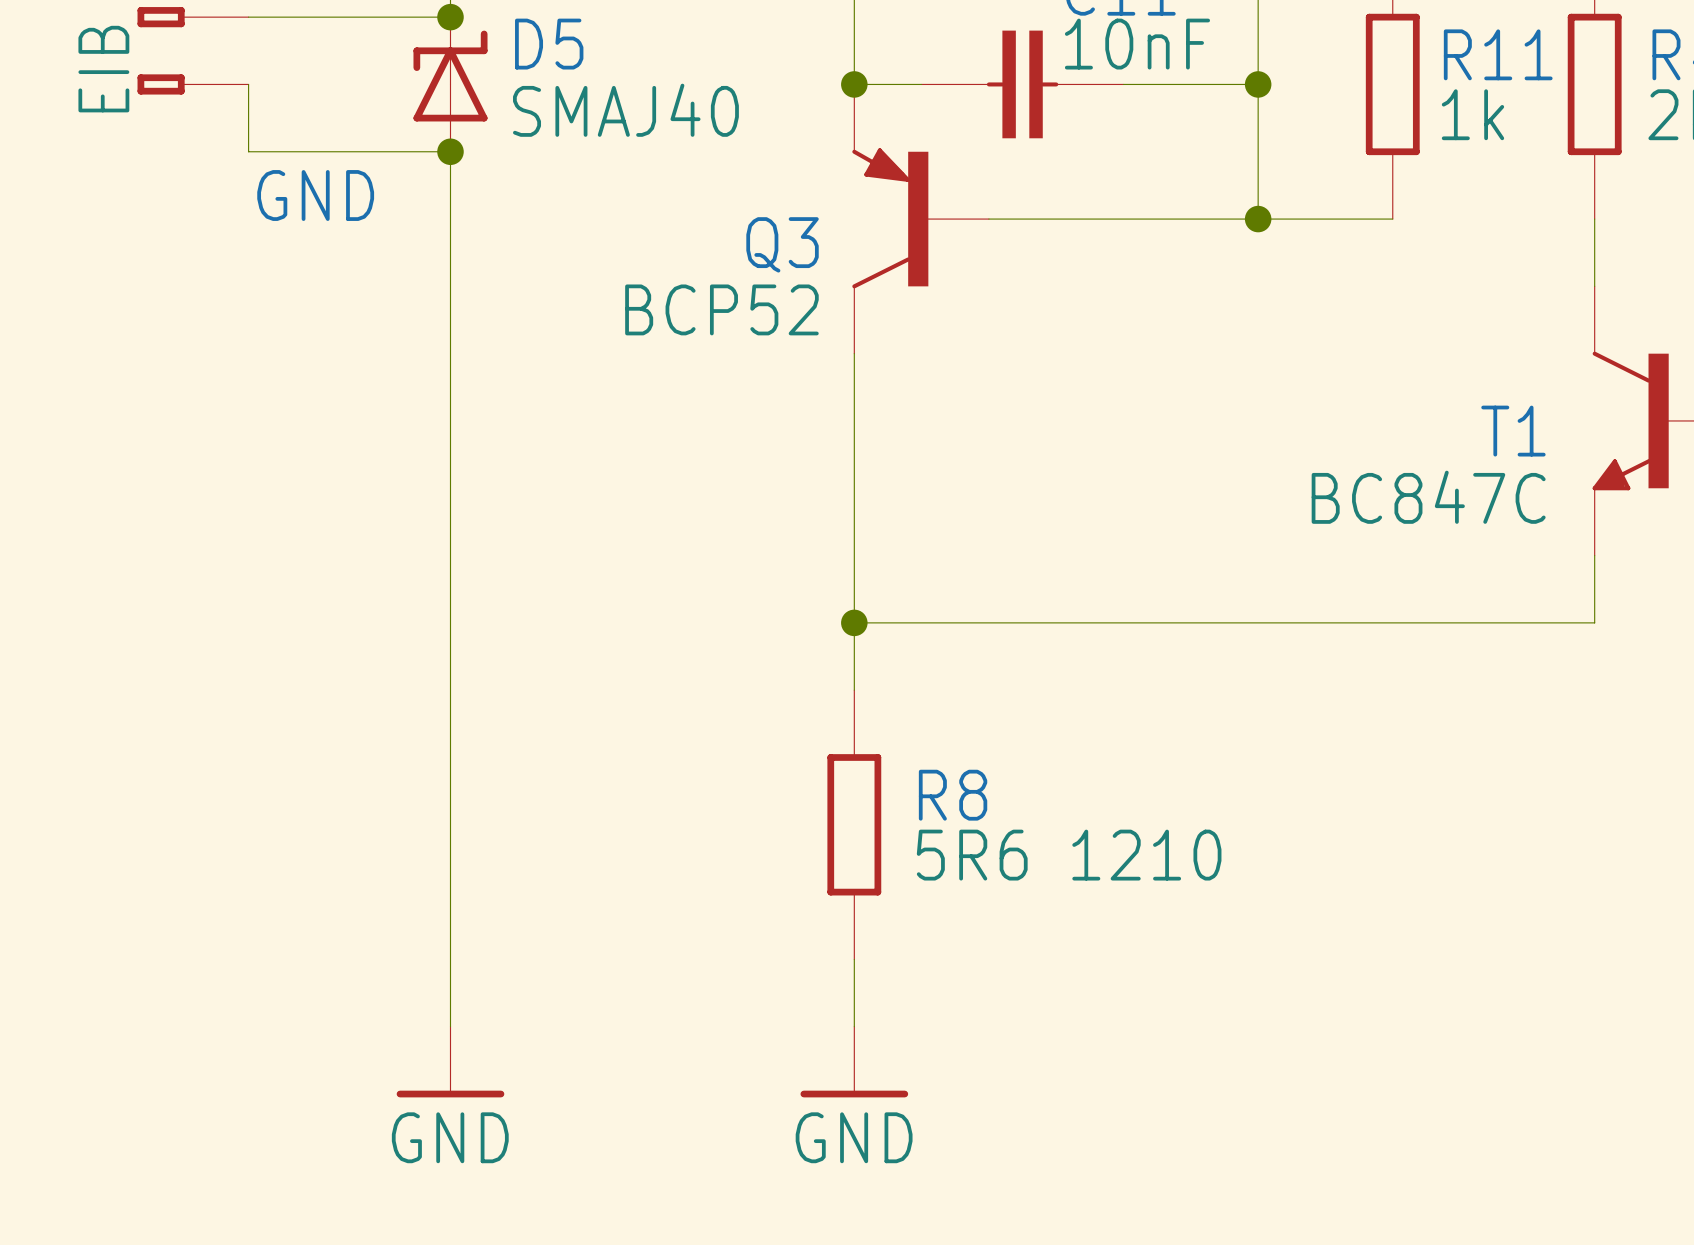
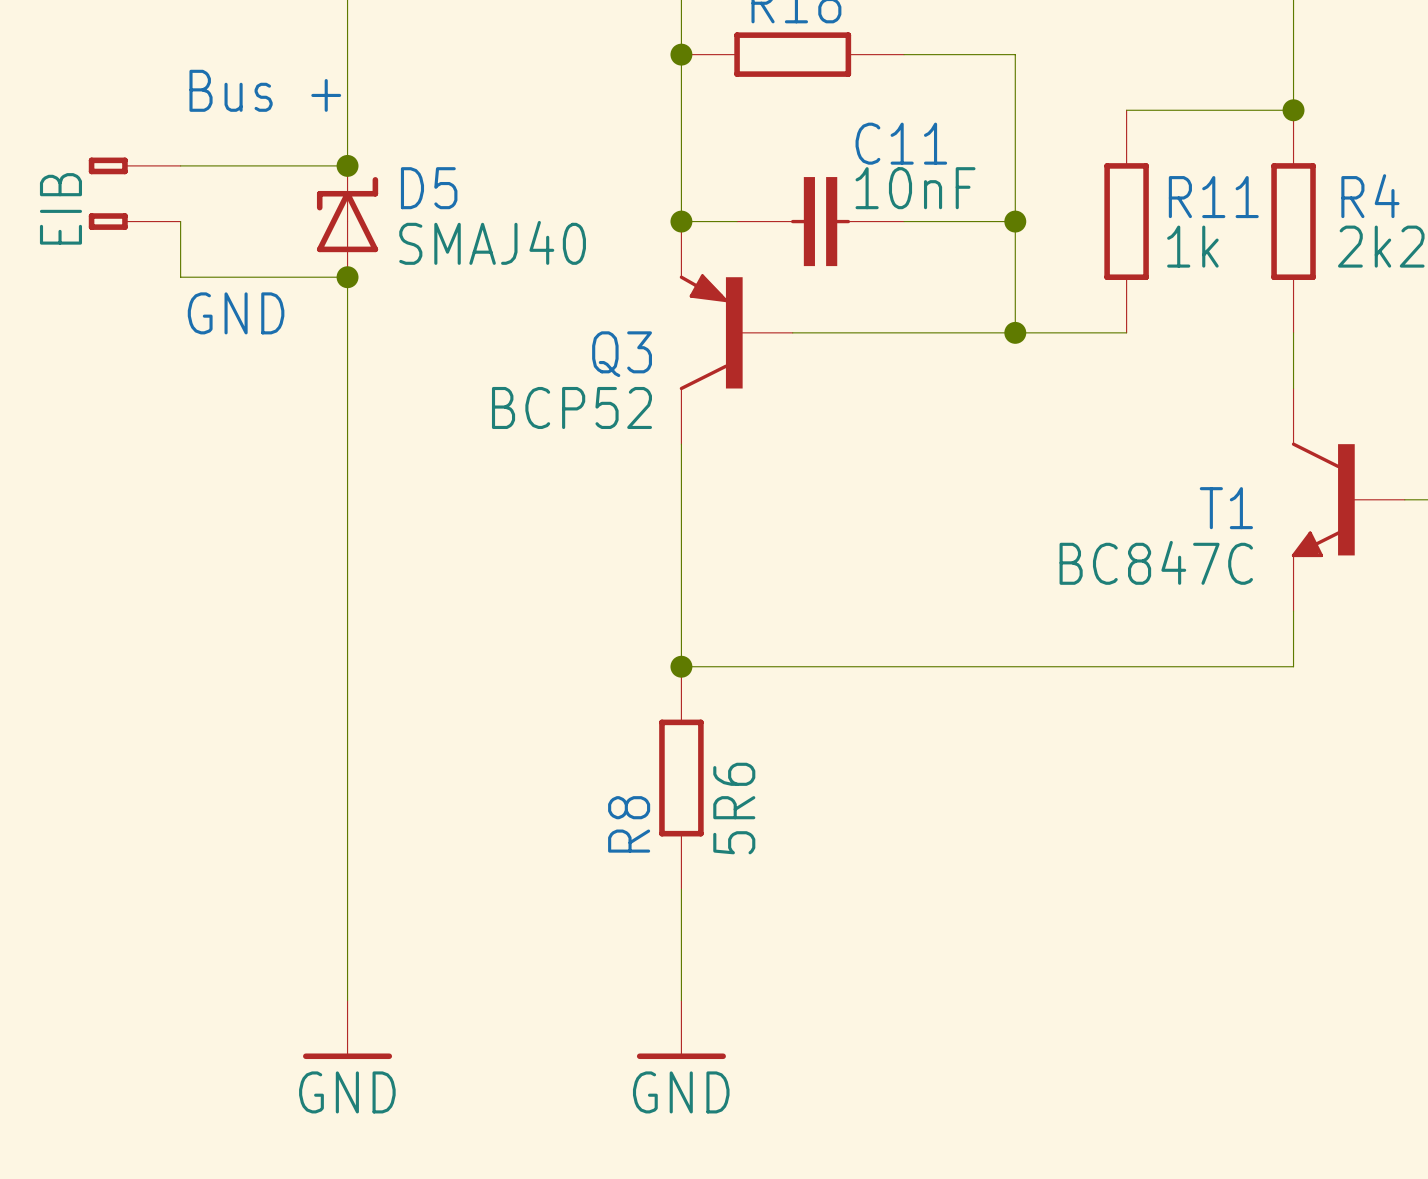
R8 name rotation: 0° (953, 795) -> 90° counterclockwise (629, 824)
R8 name position: R8 (953, 795) -> R8 (629, 824)
R8 position: (854, 824) -> (681, 778)
R8 value: 5R6 1210 (1069, 855) -> 5R6 (734, 808)

